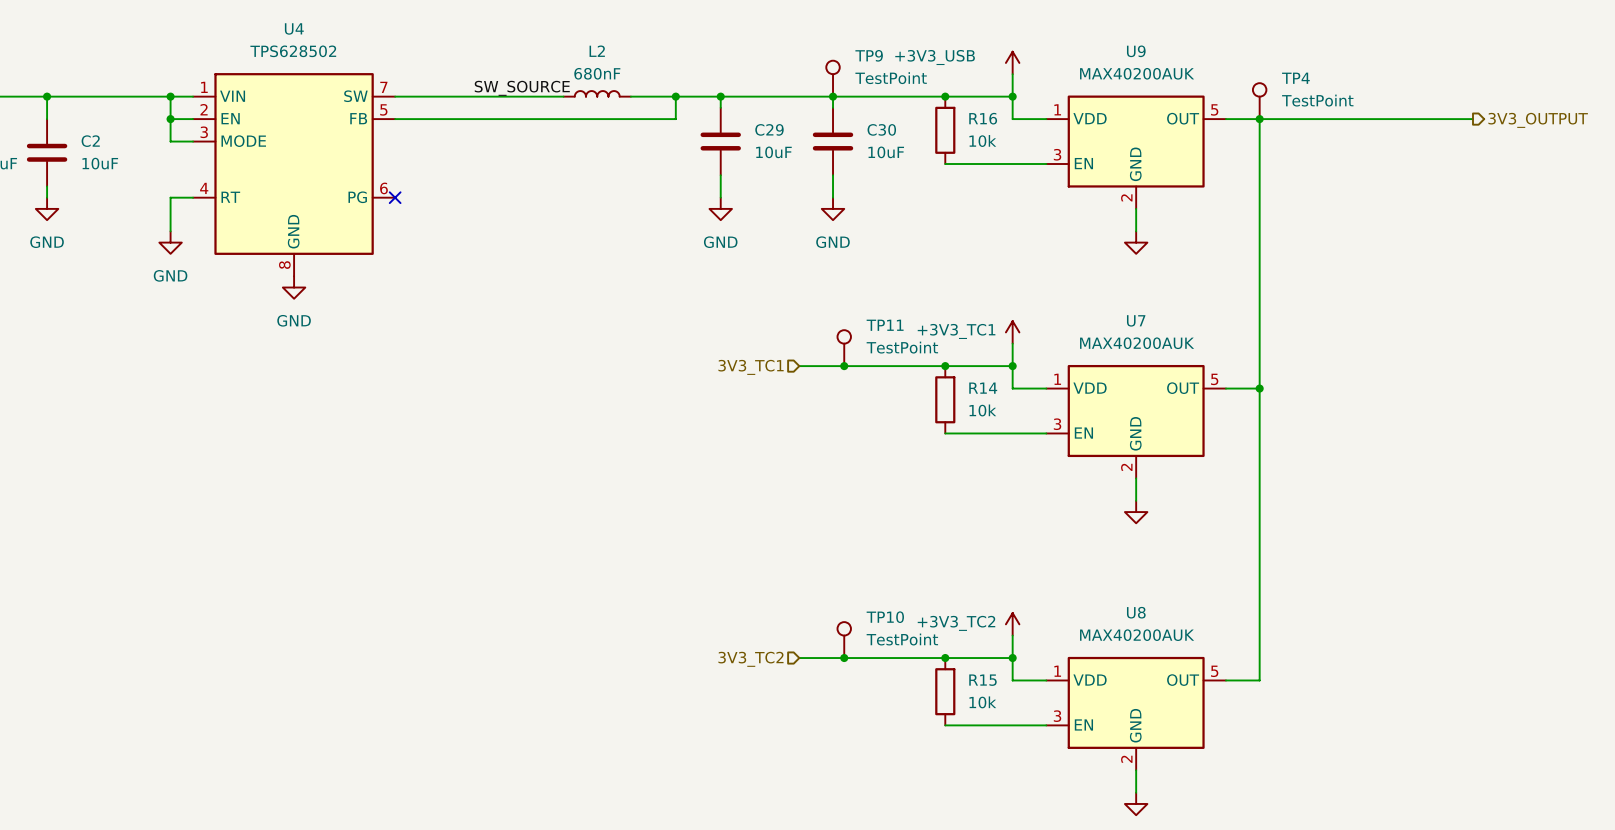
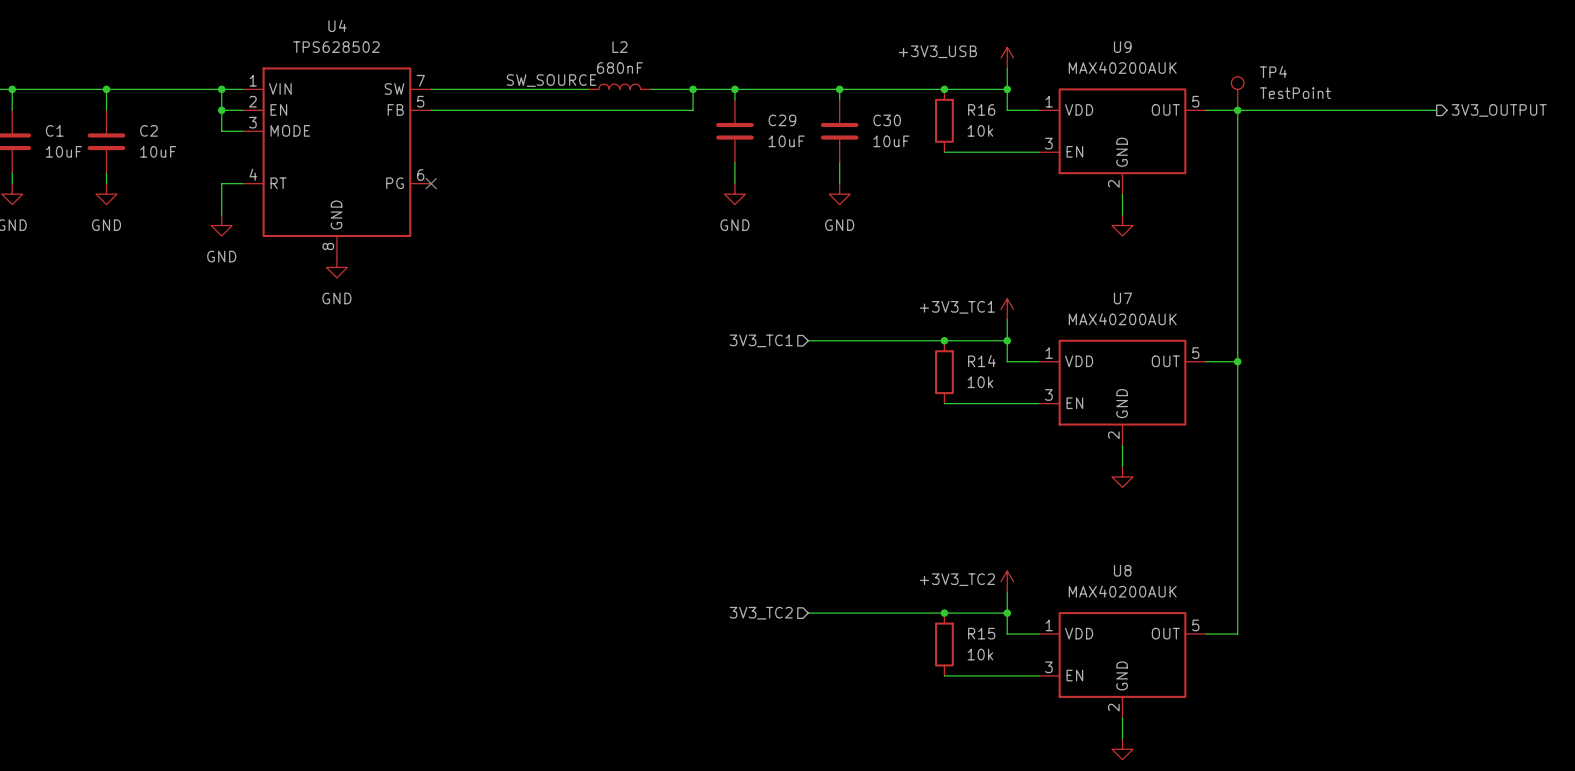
TP9: TestPoint (833, 78) -> none
TP11: TestPoint (844, 348) -> none
junction: (844, 366) -> none
TP10: TestPoint (844, 640) -> none
junction: (844, 658) -> none

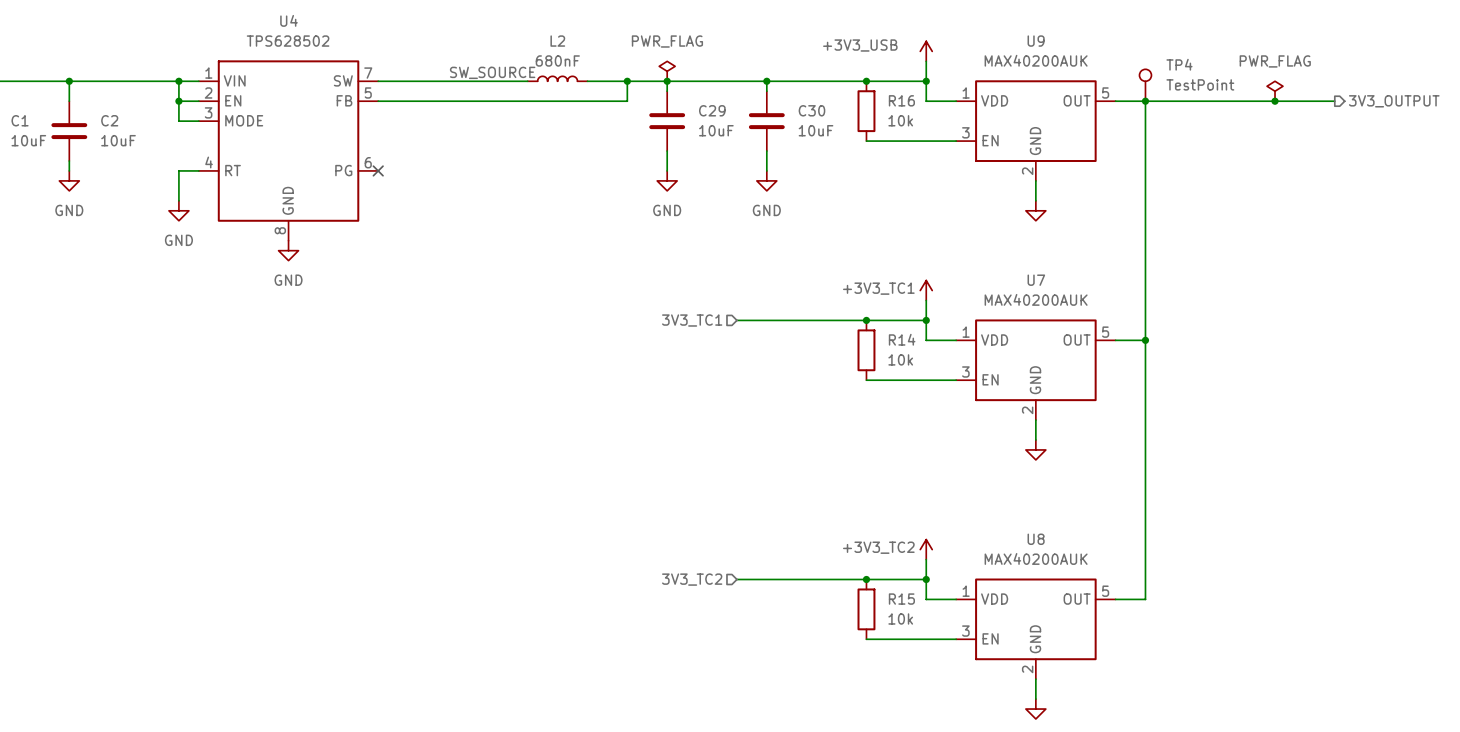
power symbol: none -> PWR_FLAG (667, 71)
power symbol: none -> PWR_FLAG (1275, 91)
junction: none -> (1275, 101)

